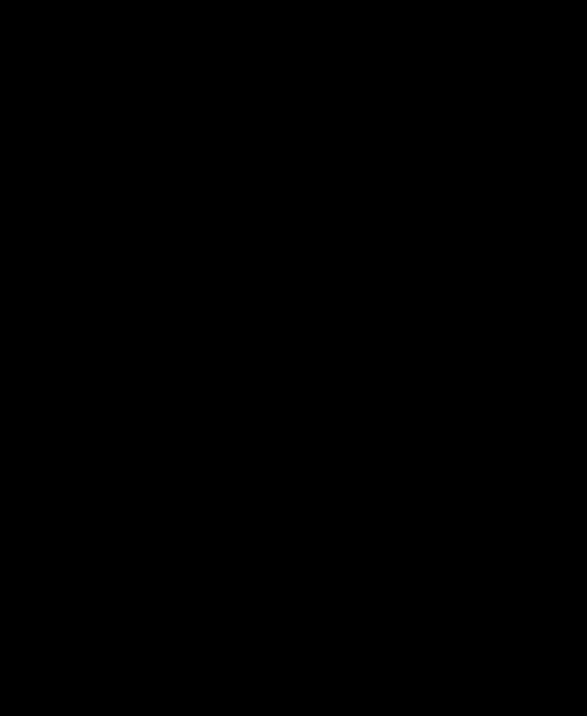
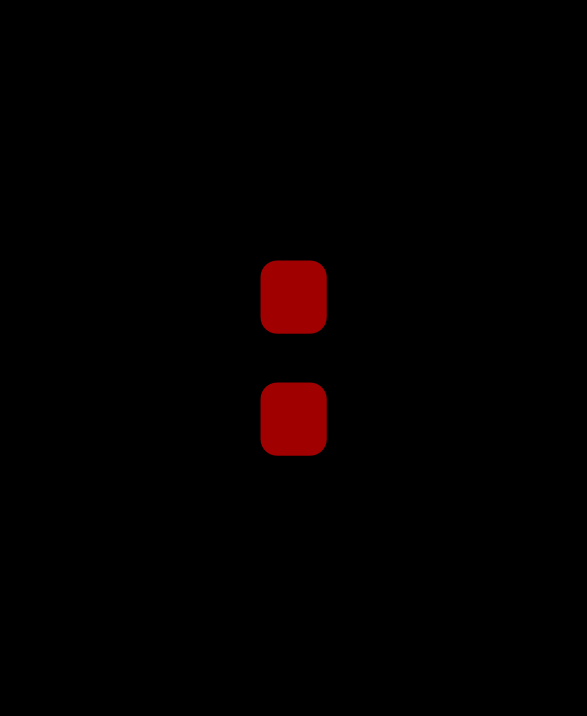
part: none -> (293, 358)

